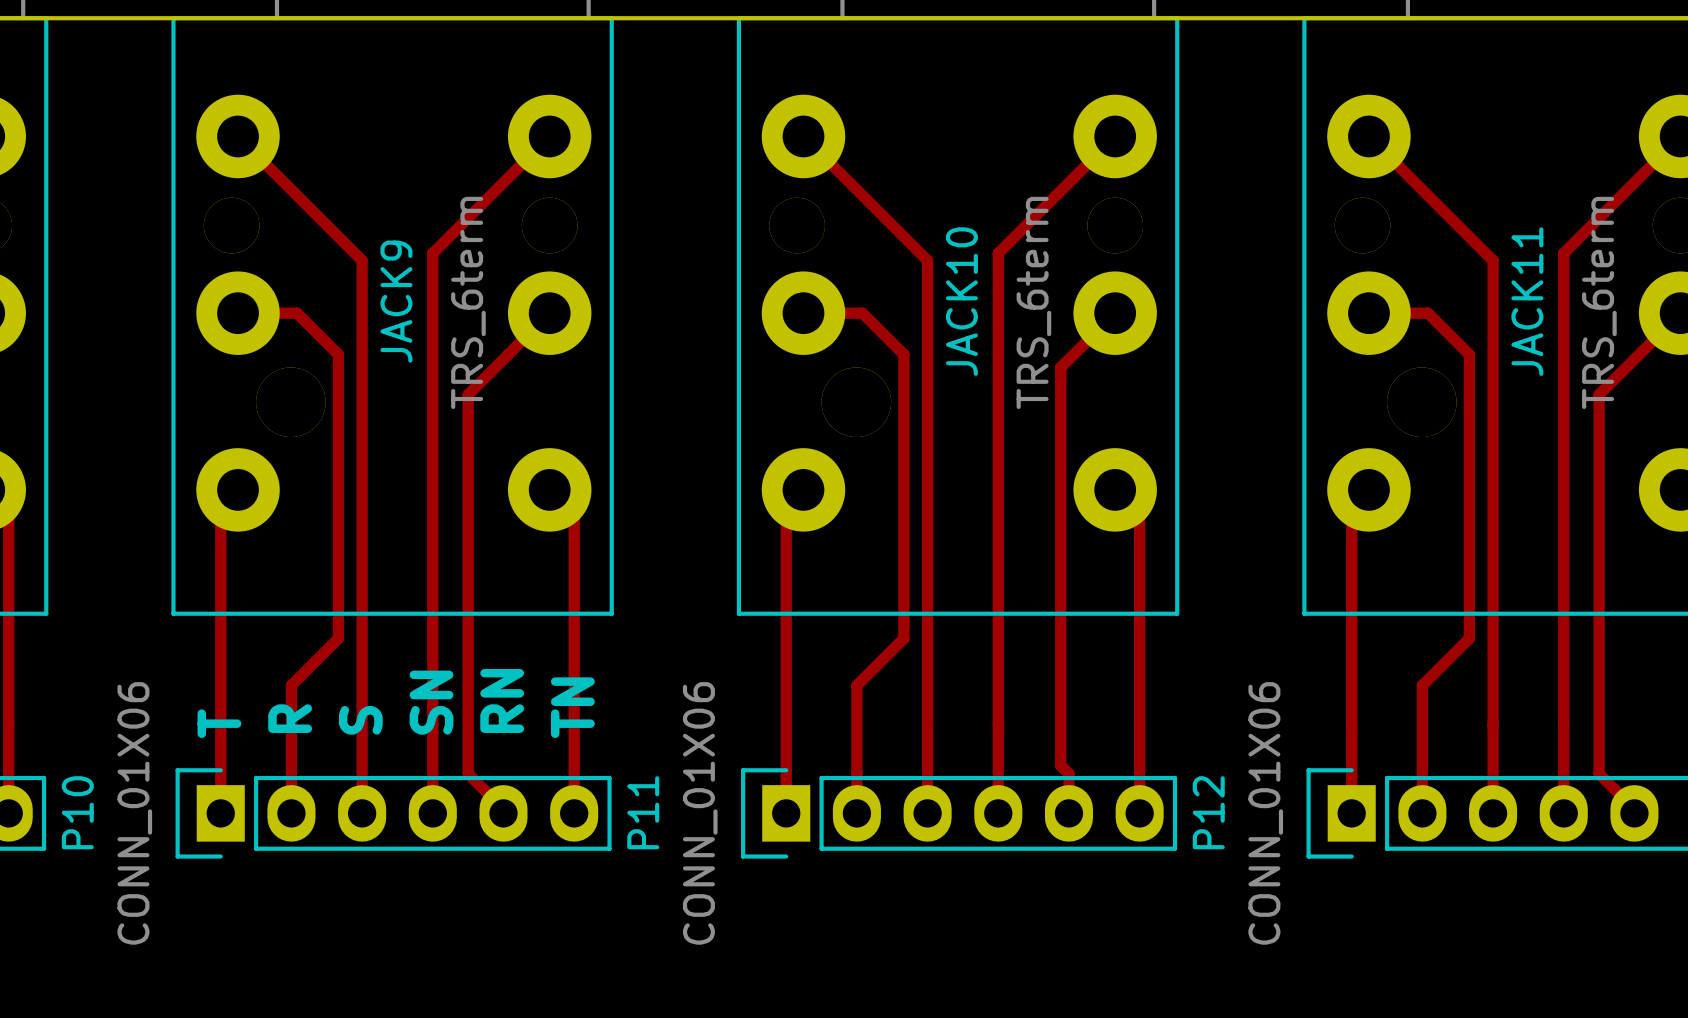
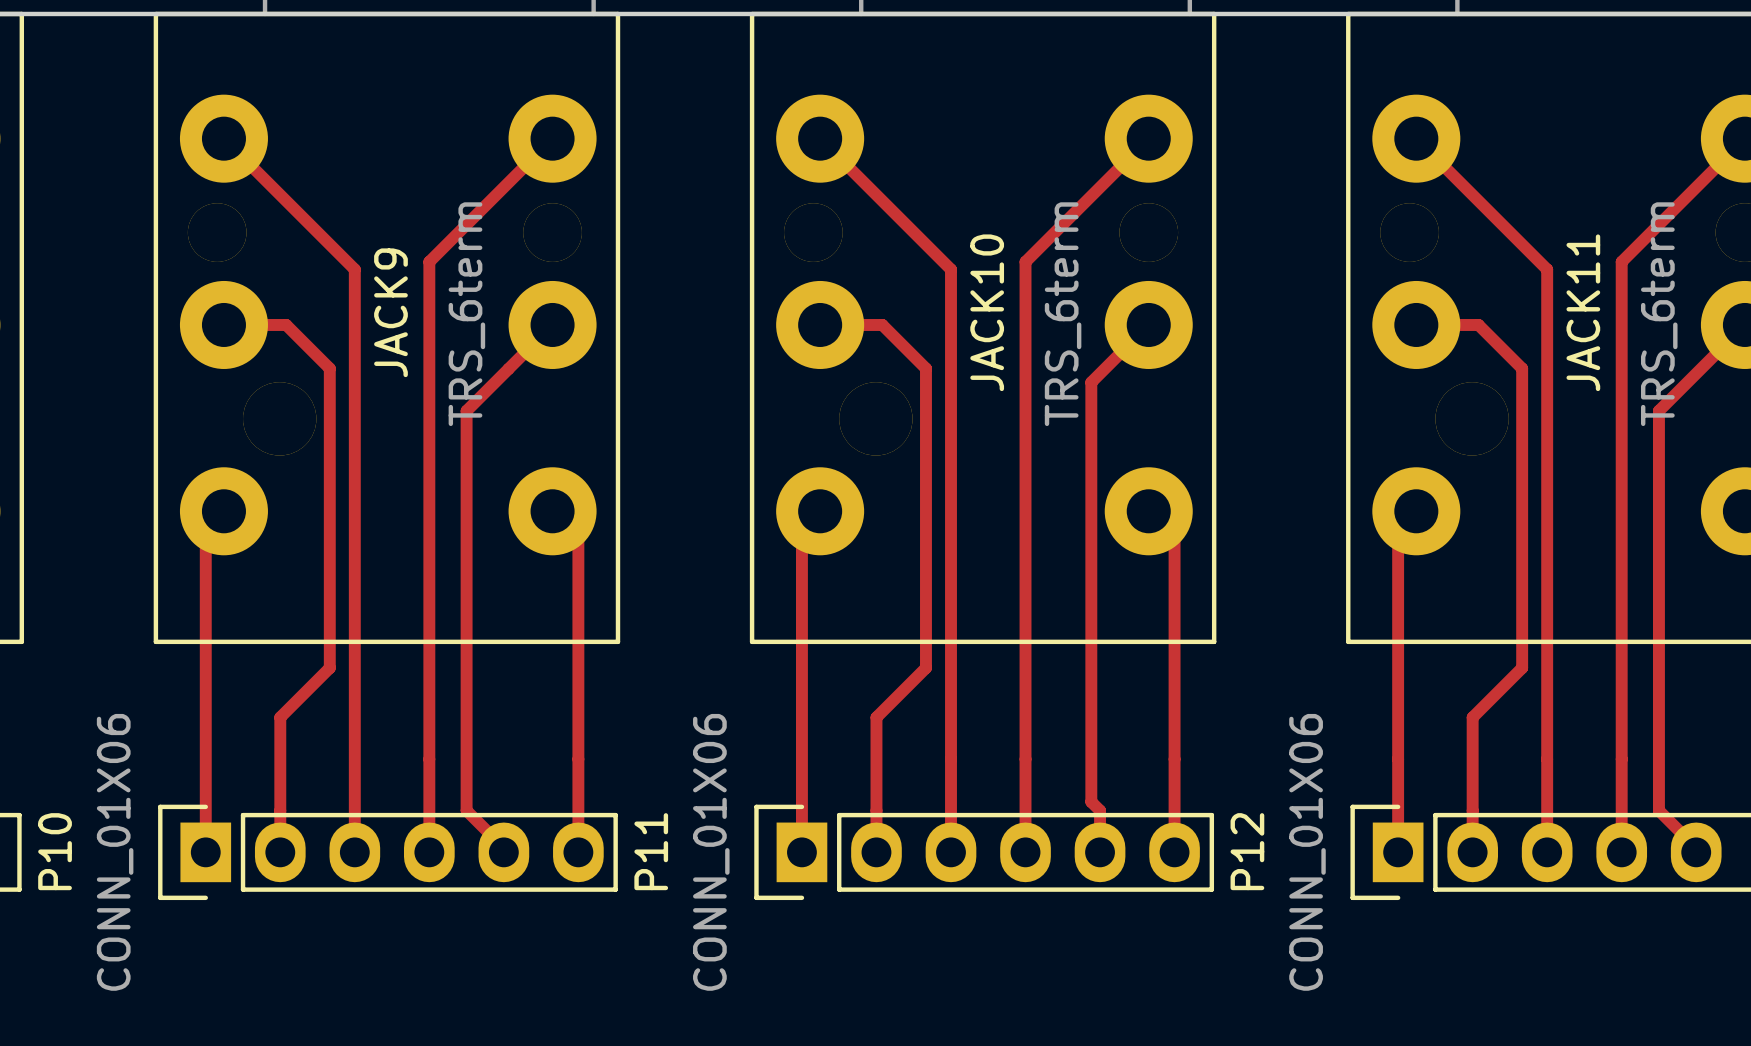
text: RN (502, 700) -> none
text: SN (431, 702) -> none
text: TN (572, 707) -> none
text: R (290, 718) -> none
text: S (360, 720) -> none
text: T (219, 723) -> none

